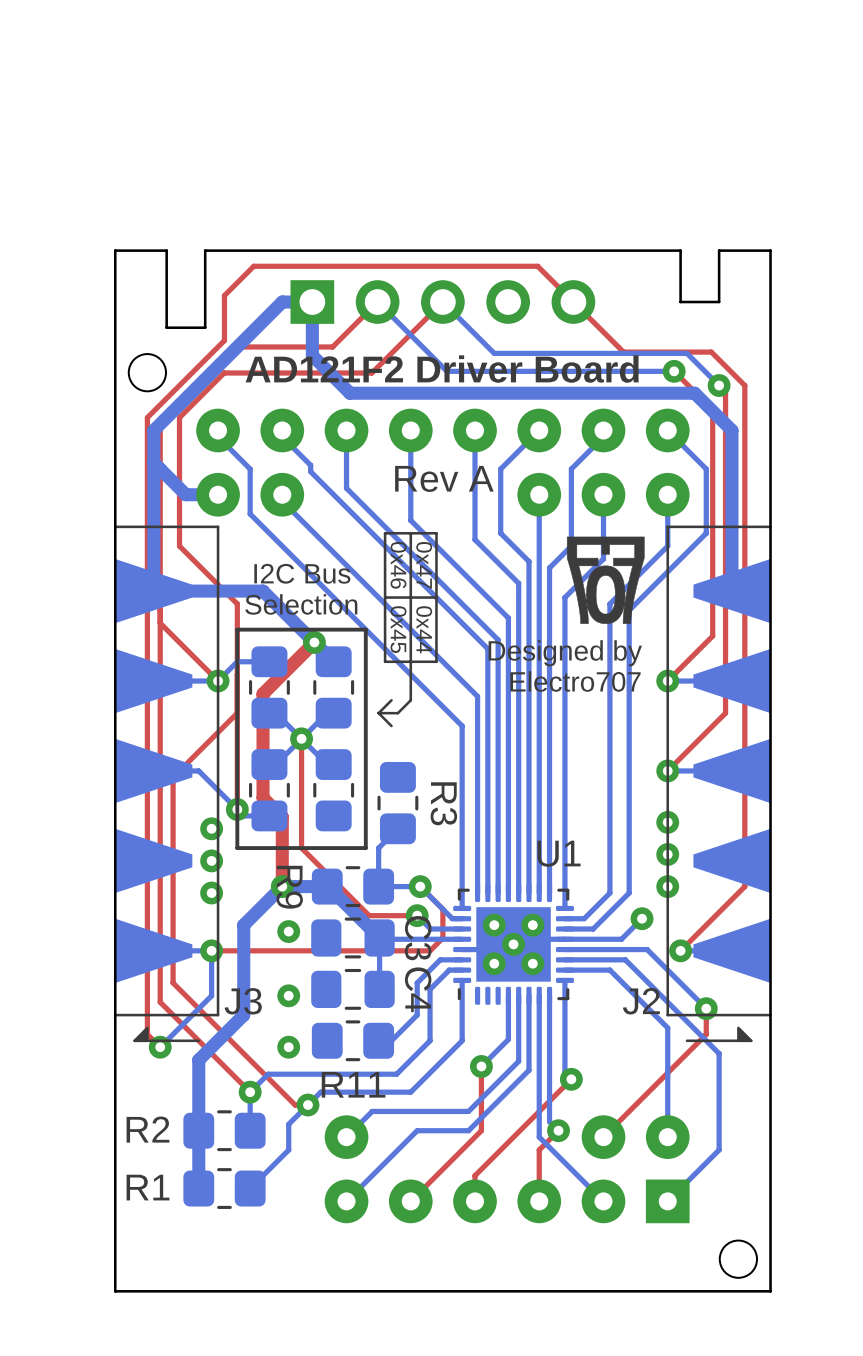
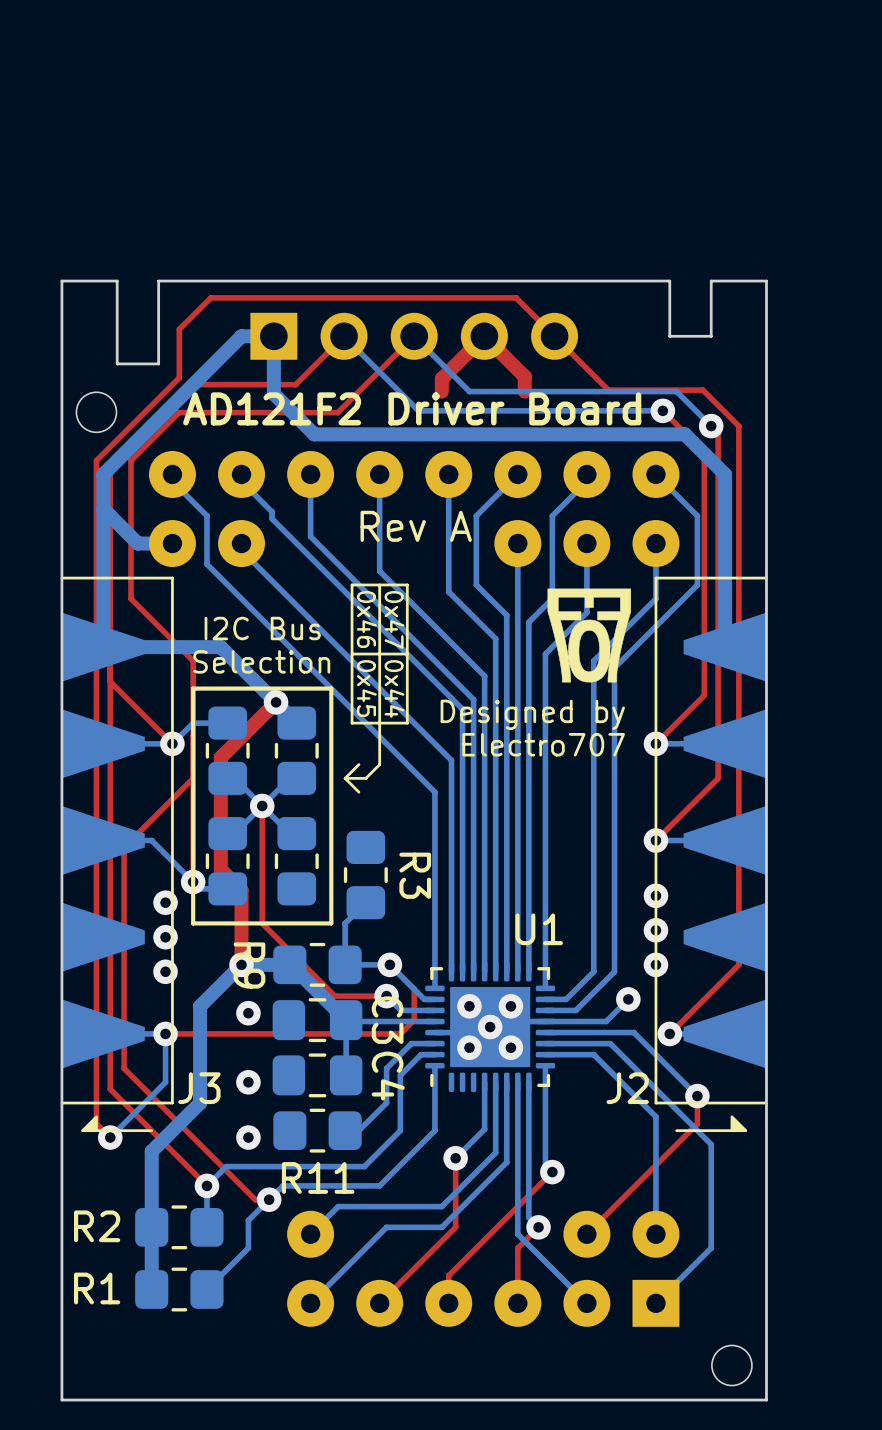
top track: none -> (524, 391) (524, 376) (484, 336) (441, 378) (441, 391)

